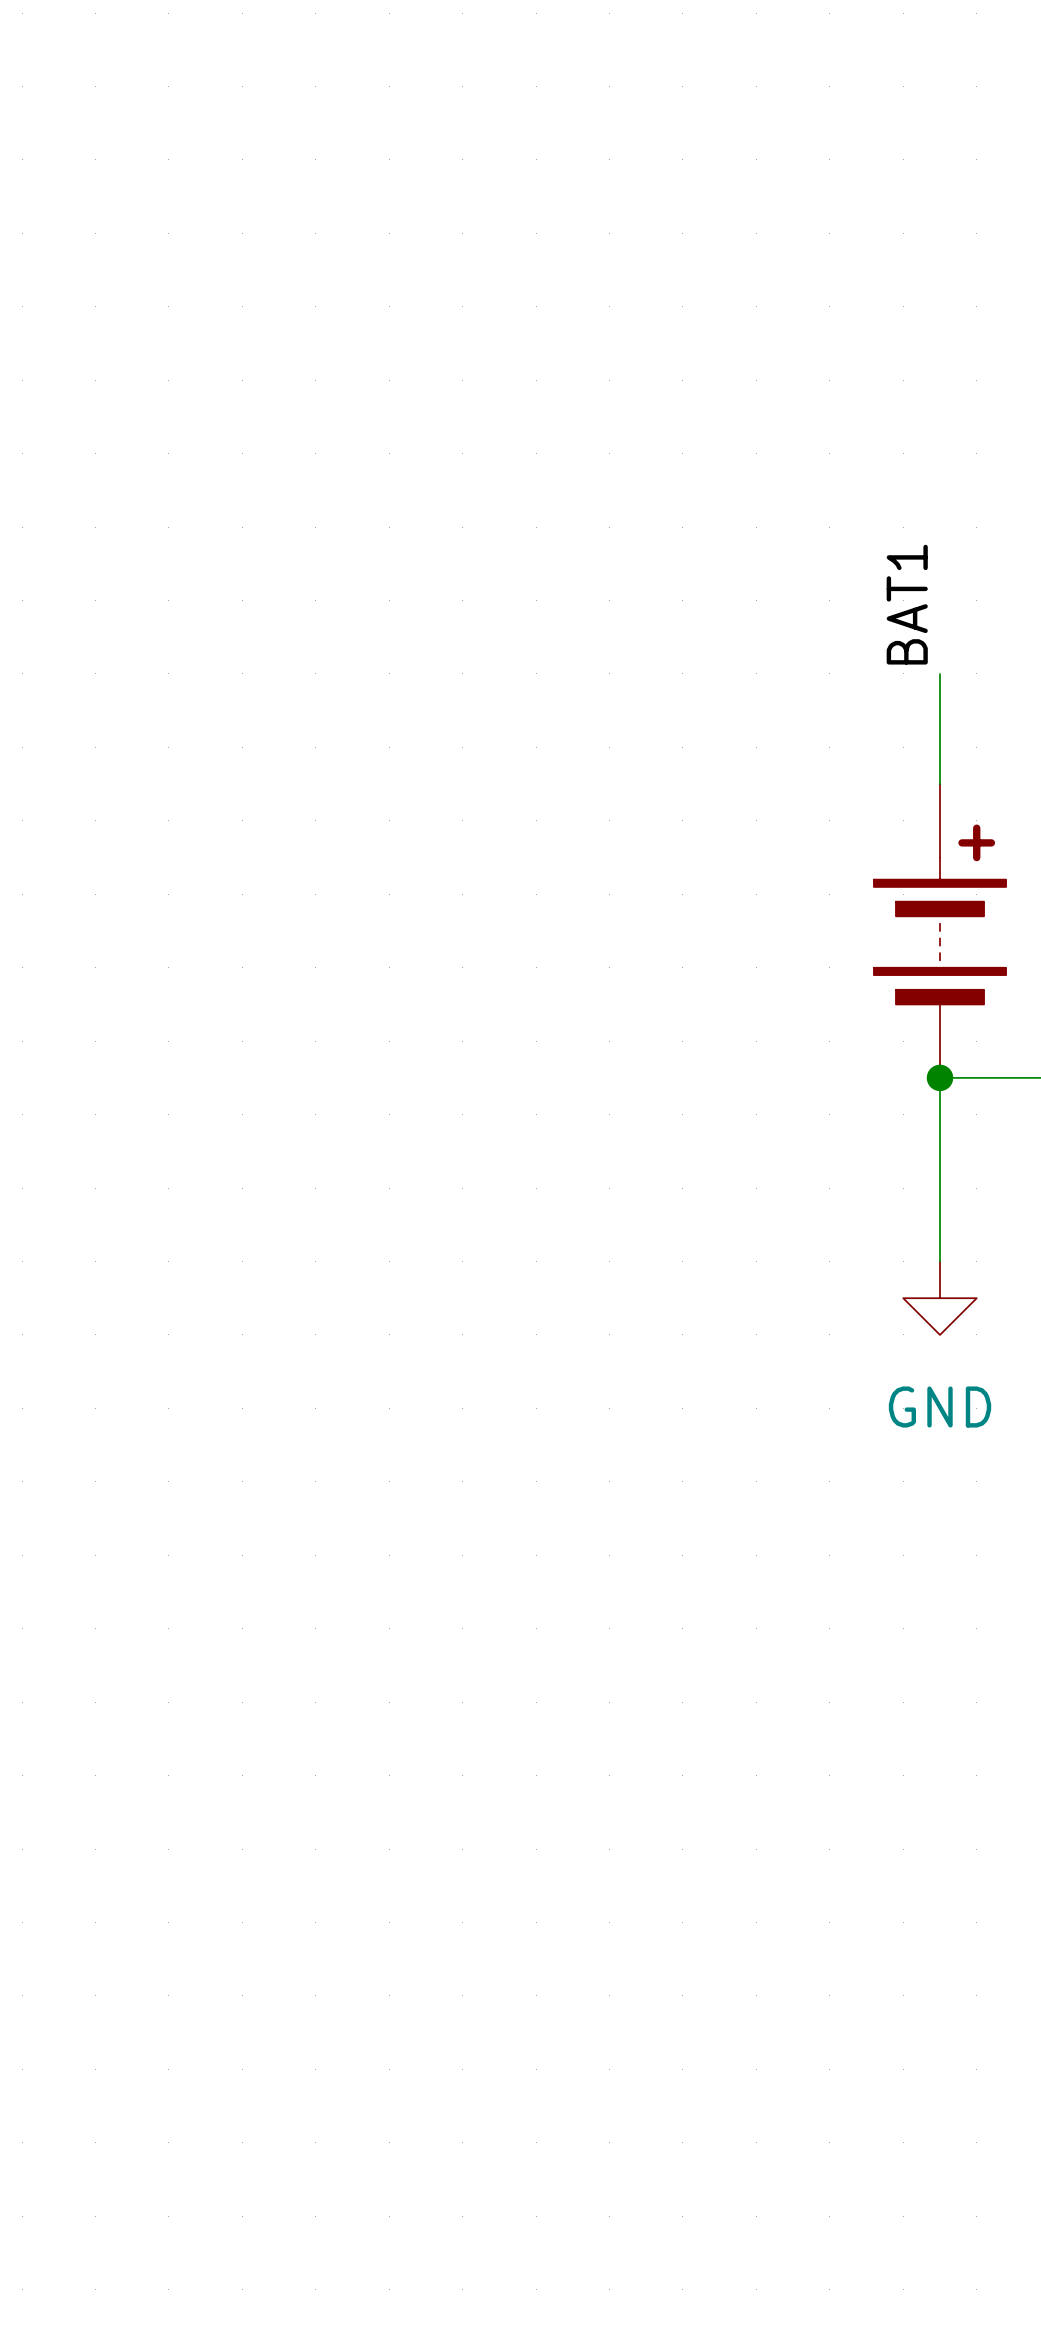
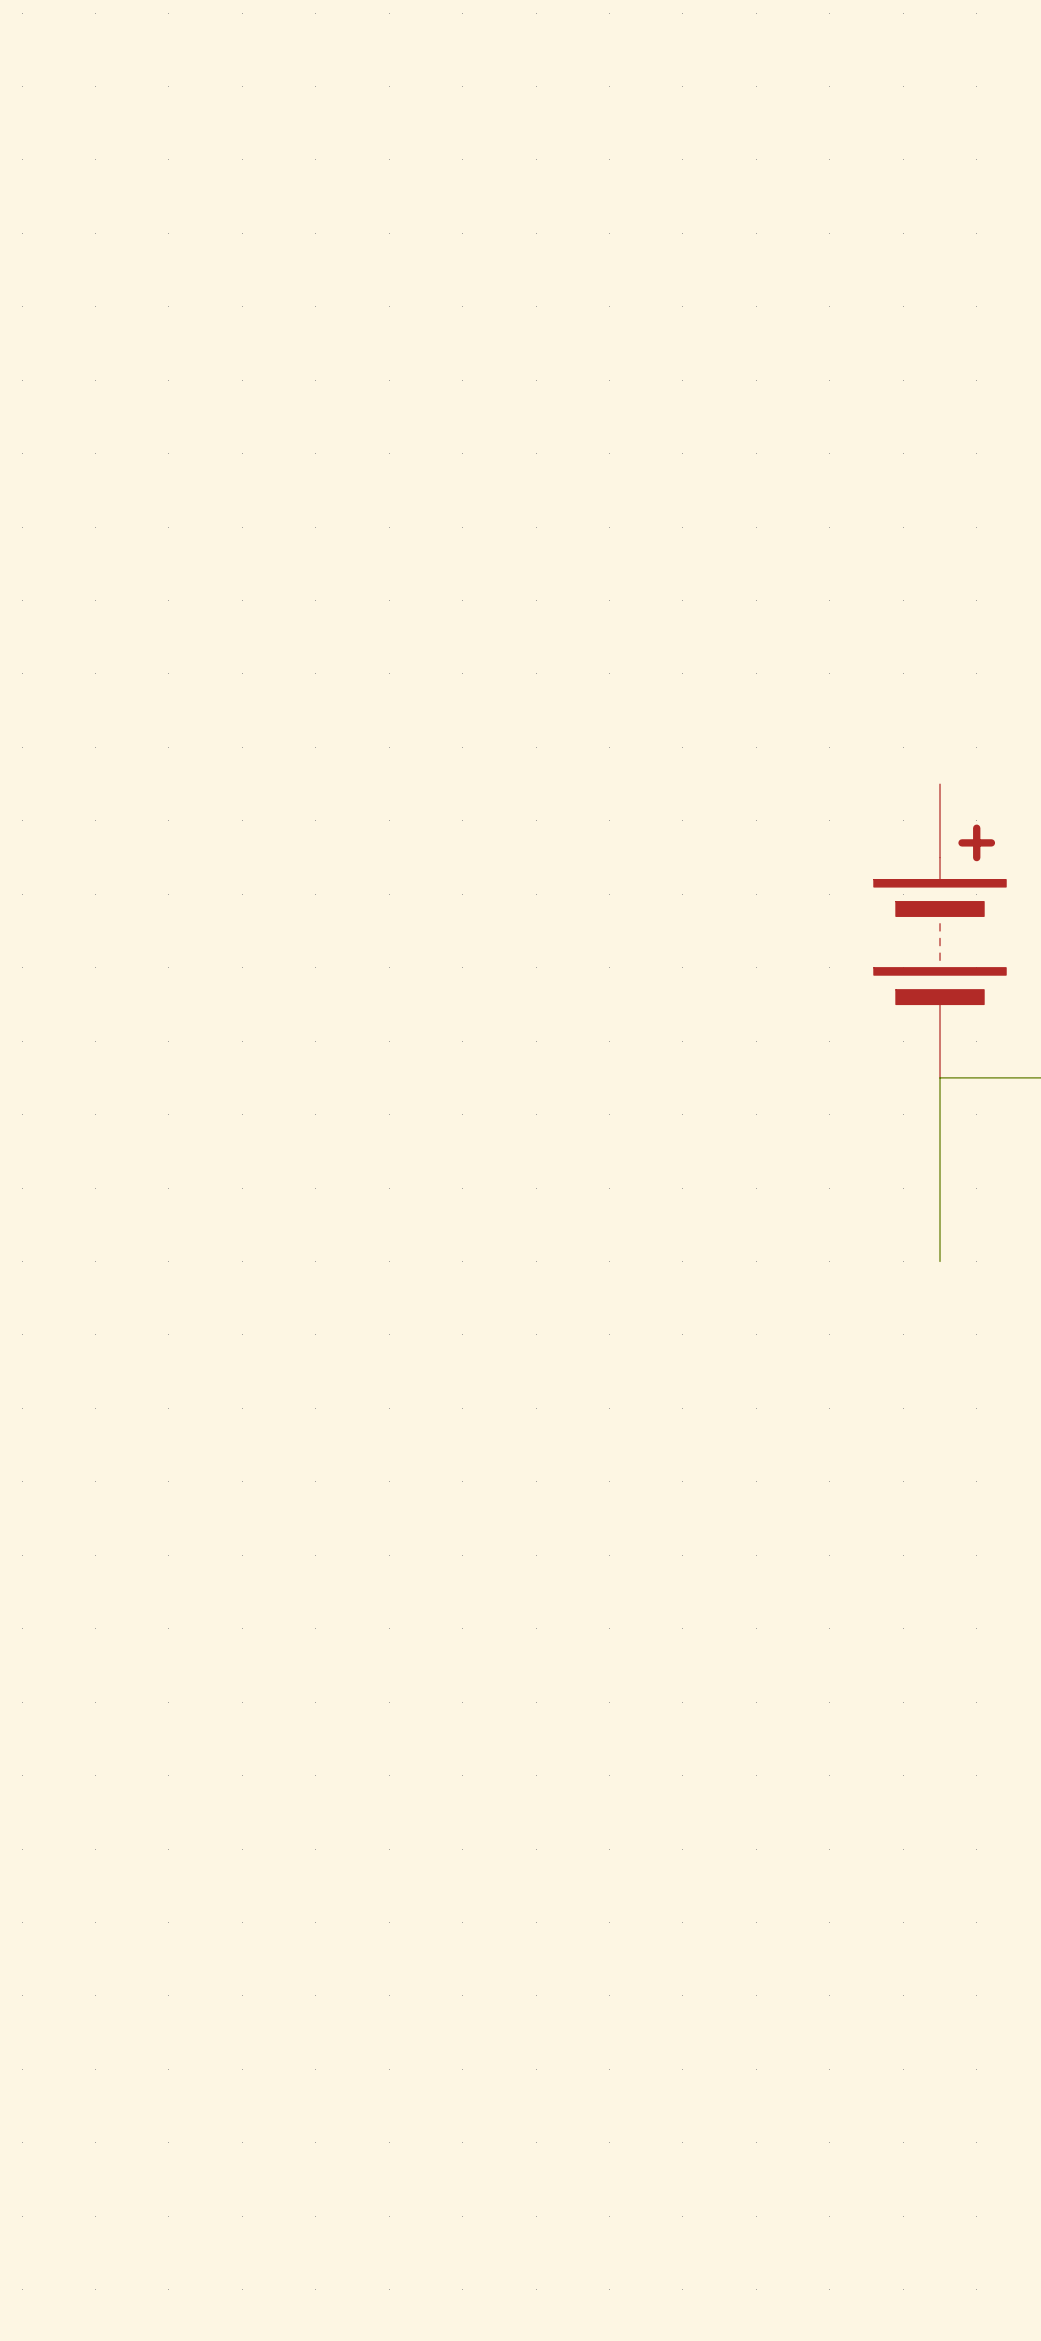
label: BAT1 (907, 604) -> none
wire: (940, 673) (940, 784) -> none
junction: (940, 1077) -> none
power symbol: GND (940, 1298) -> none

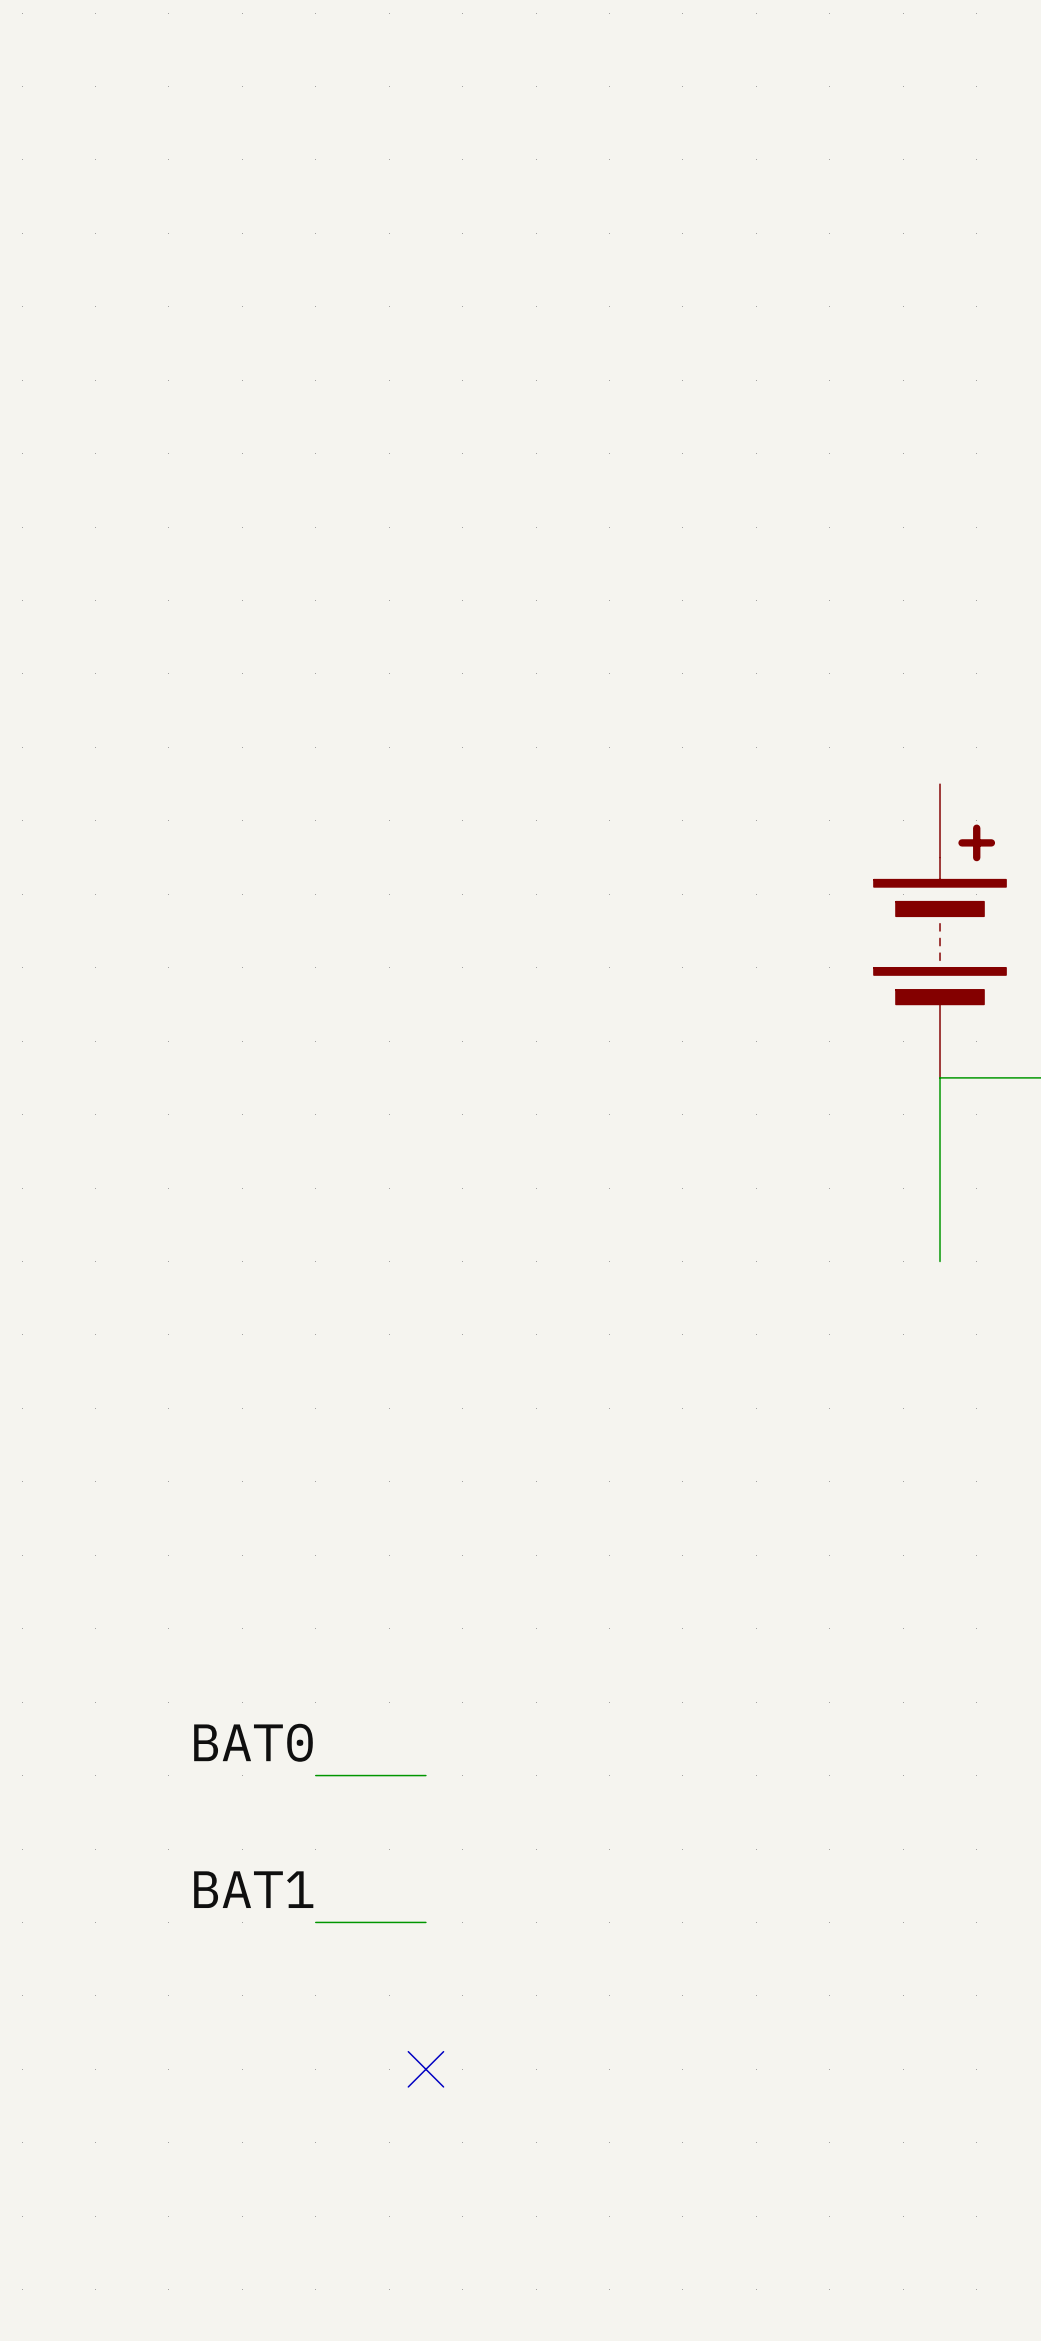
label: none -> BAT0 (253, 1742)
wire: none -> (315, 1775) (425, 1775)
label: none -> BAT1 (253, 1889)
wire: none -> (315, 1922) (425, 1922)
no-connect mark: none -> (425, 2069)

